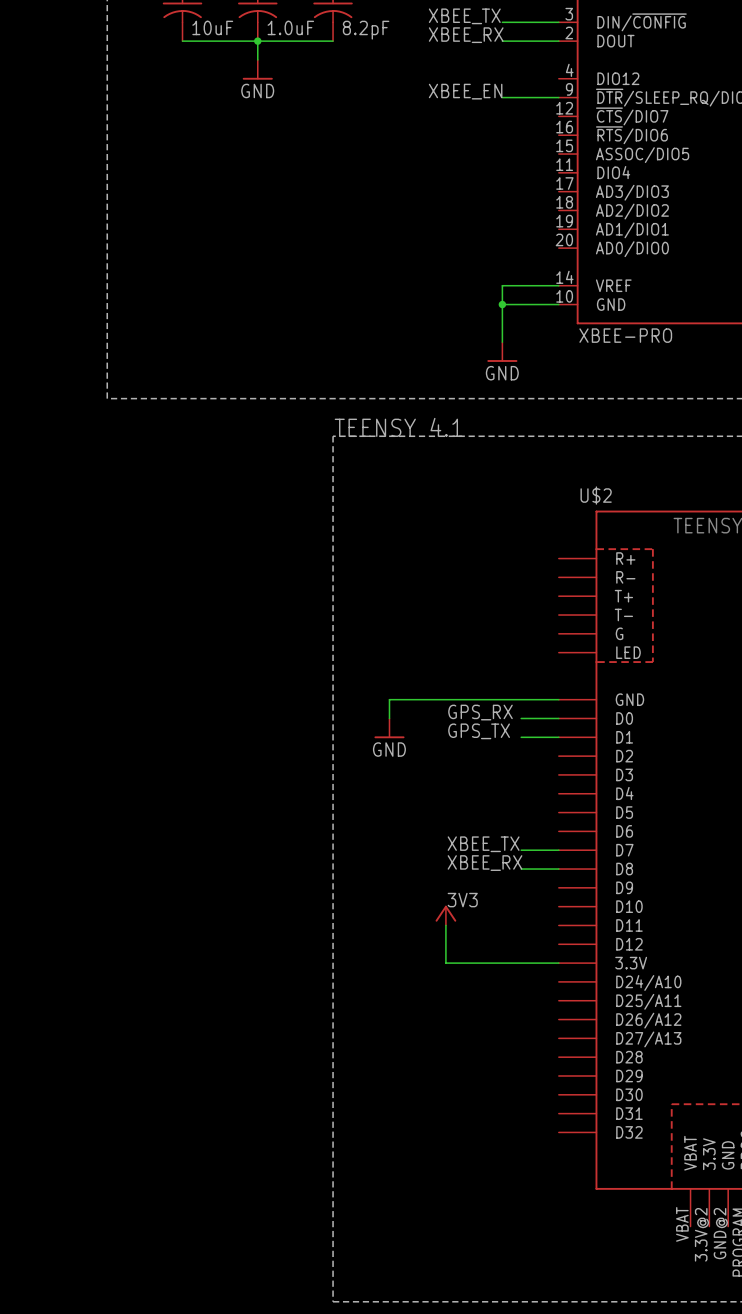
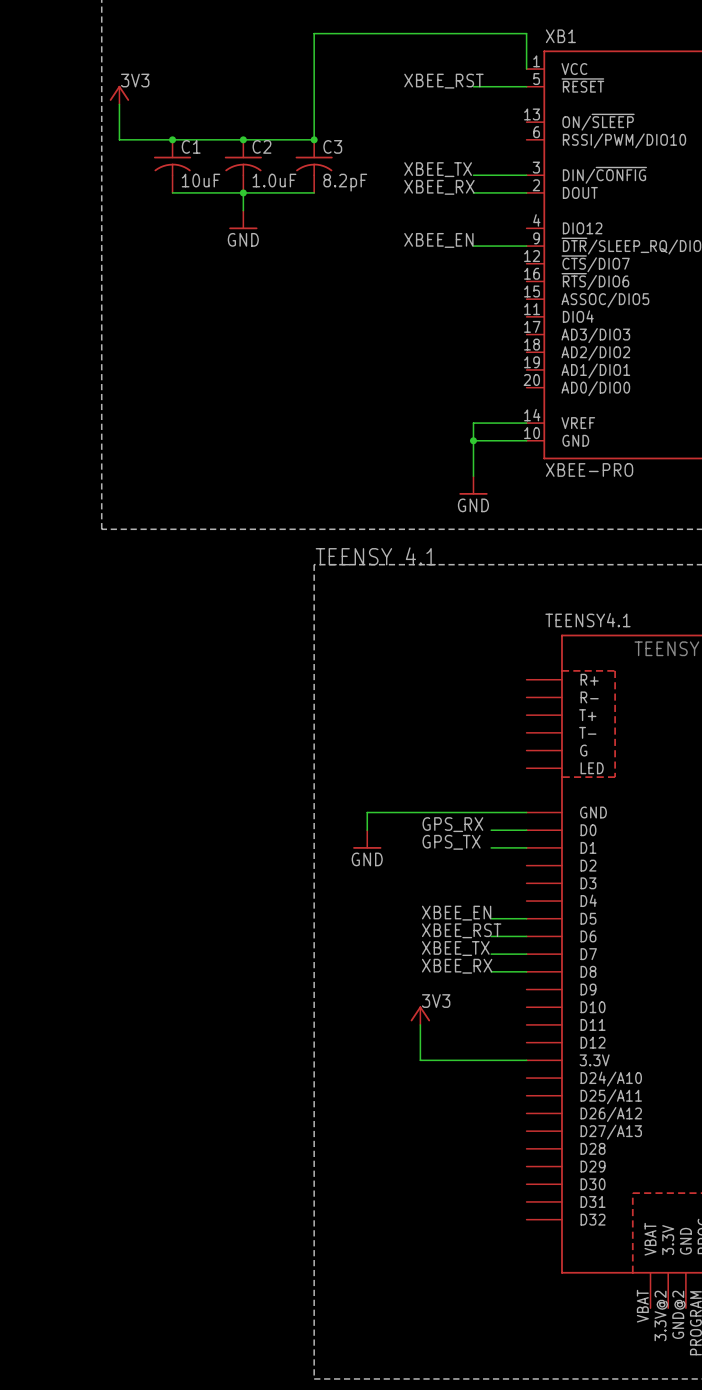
U$2 name: U$2 (596, 495) -> TEENSY4.1 (587, 620)
label: none -> XBEE_EN (456, 913)
wire: none -> (491, 918) (526, 918)
label: none -> XBEE_RST (461, 930)
wire: none -> (491, 936) (526, 936)

